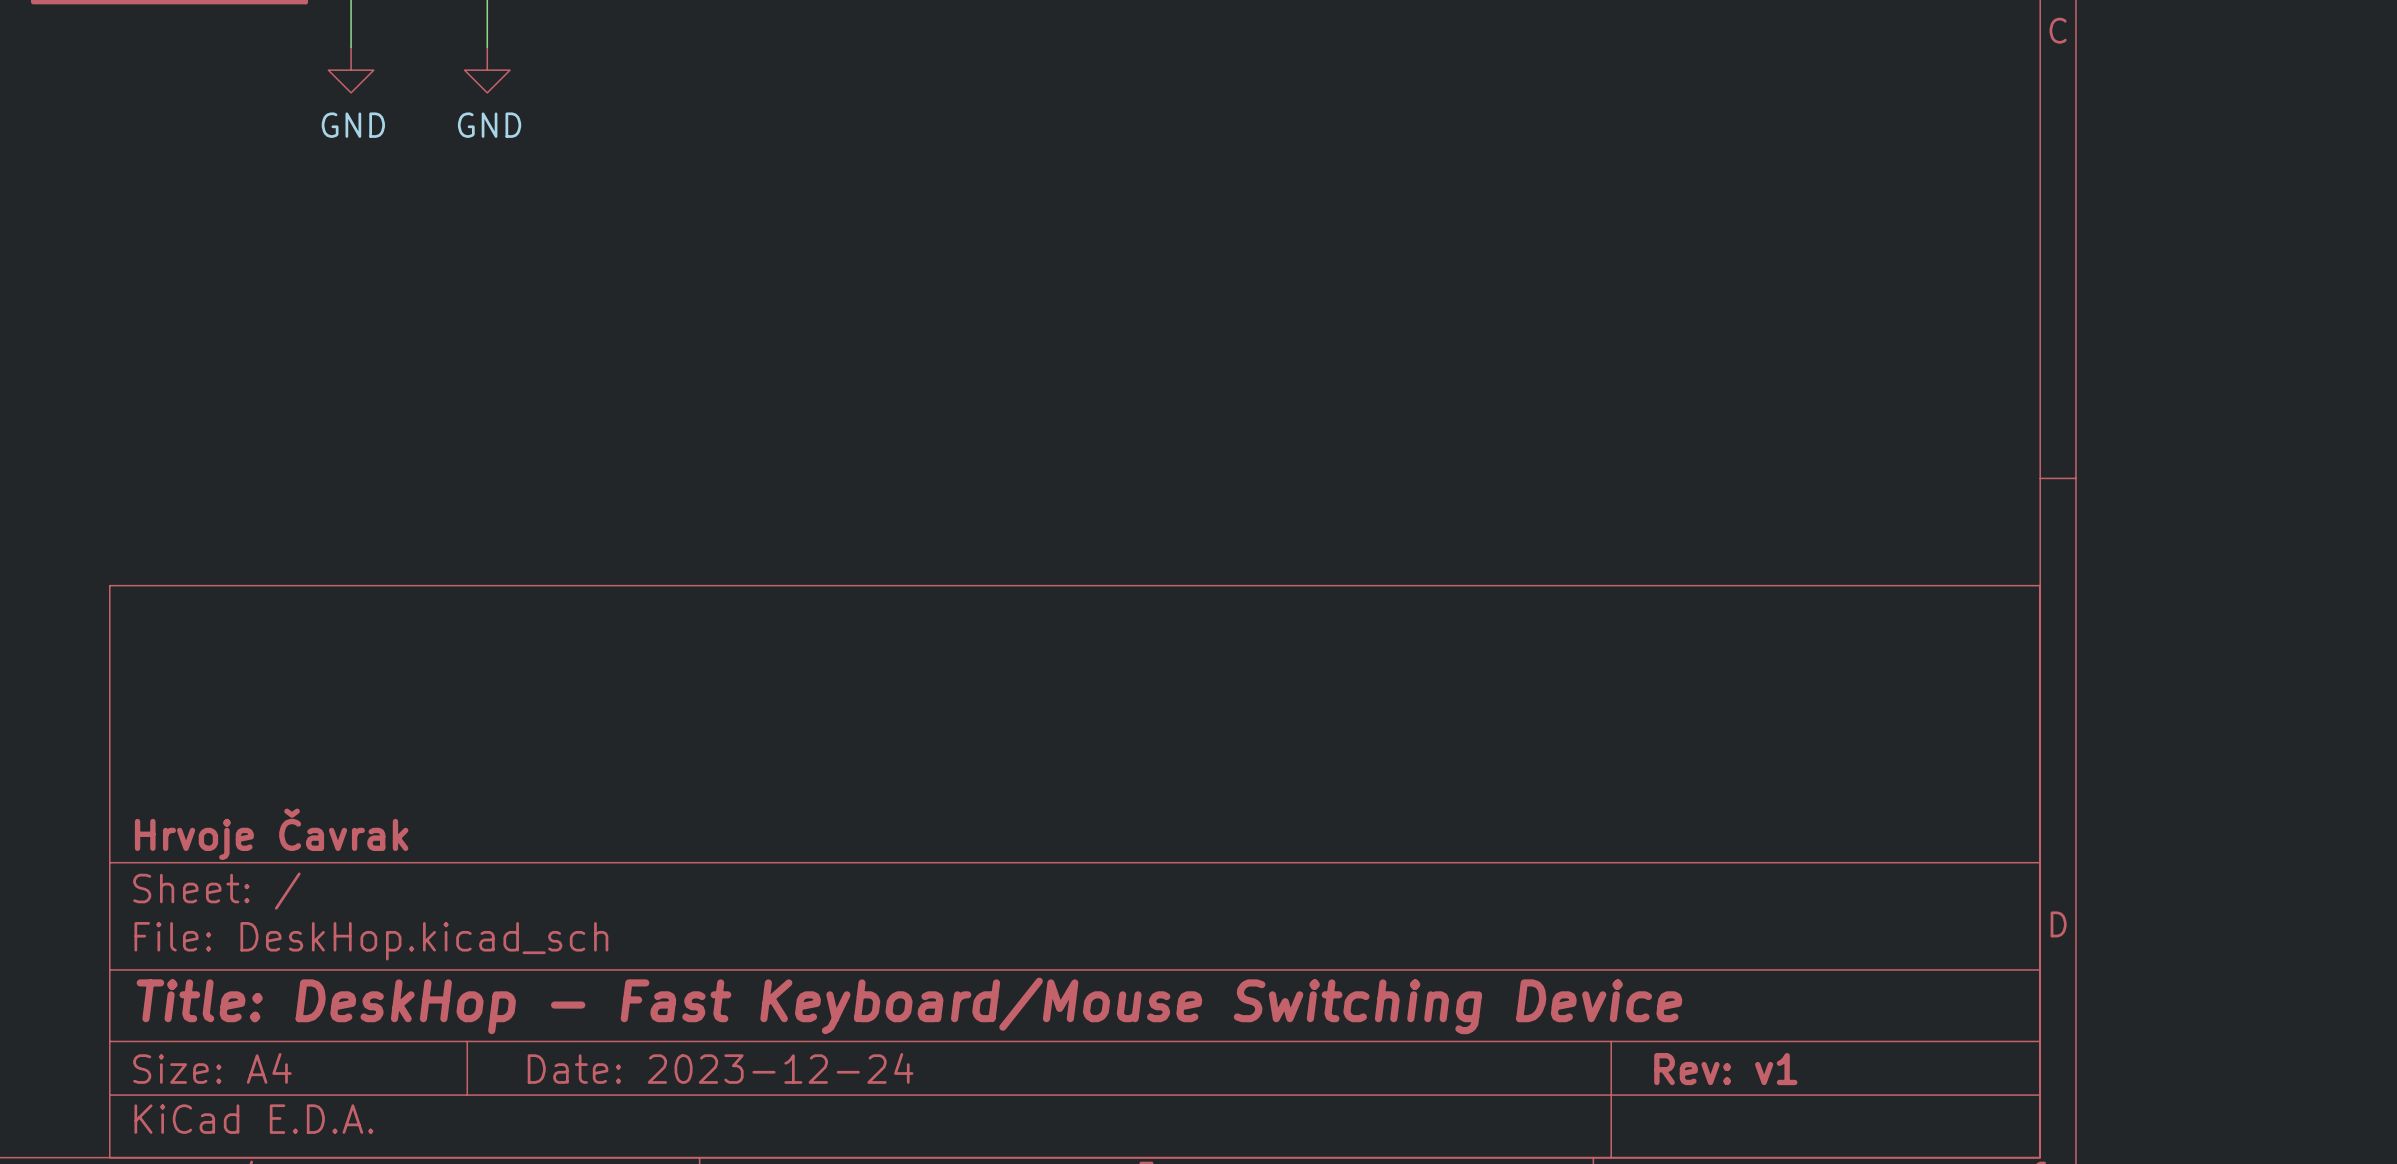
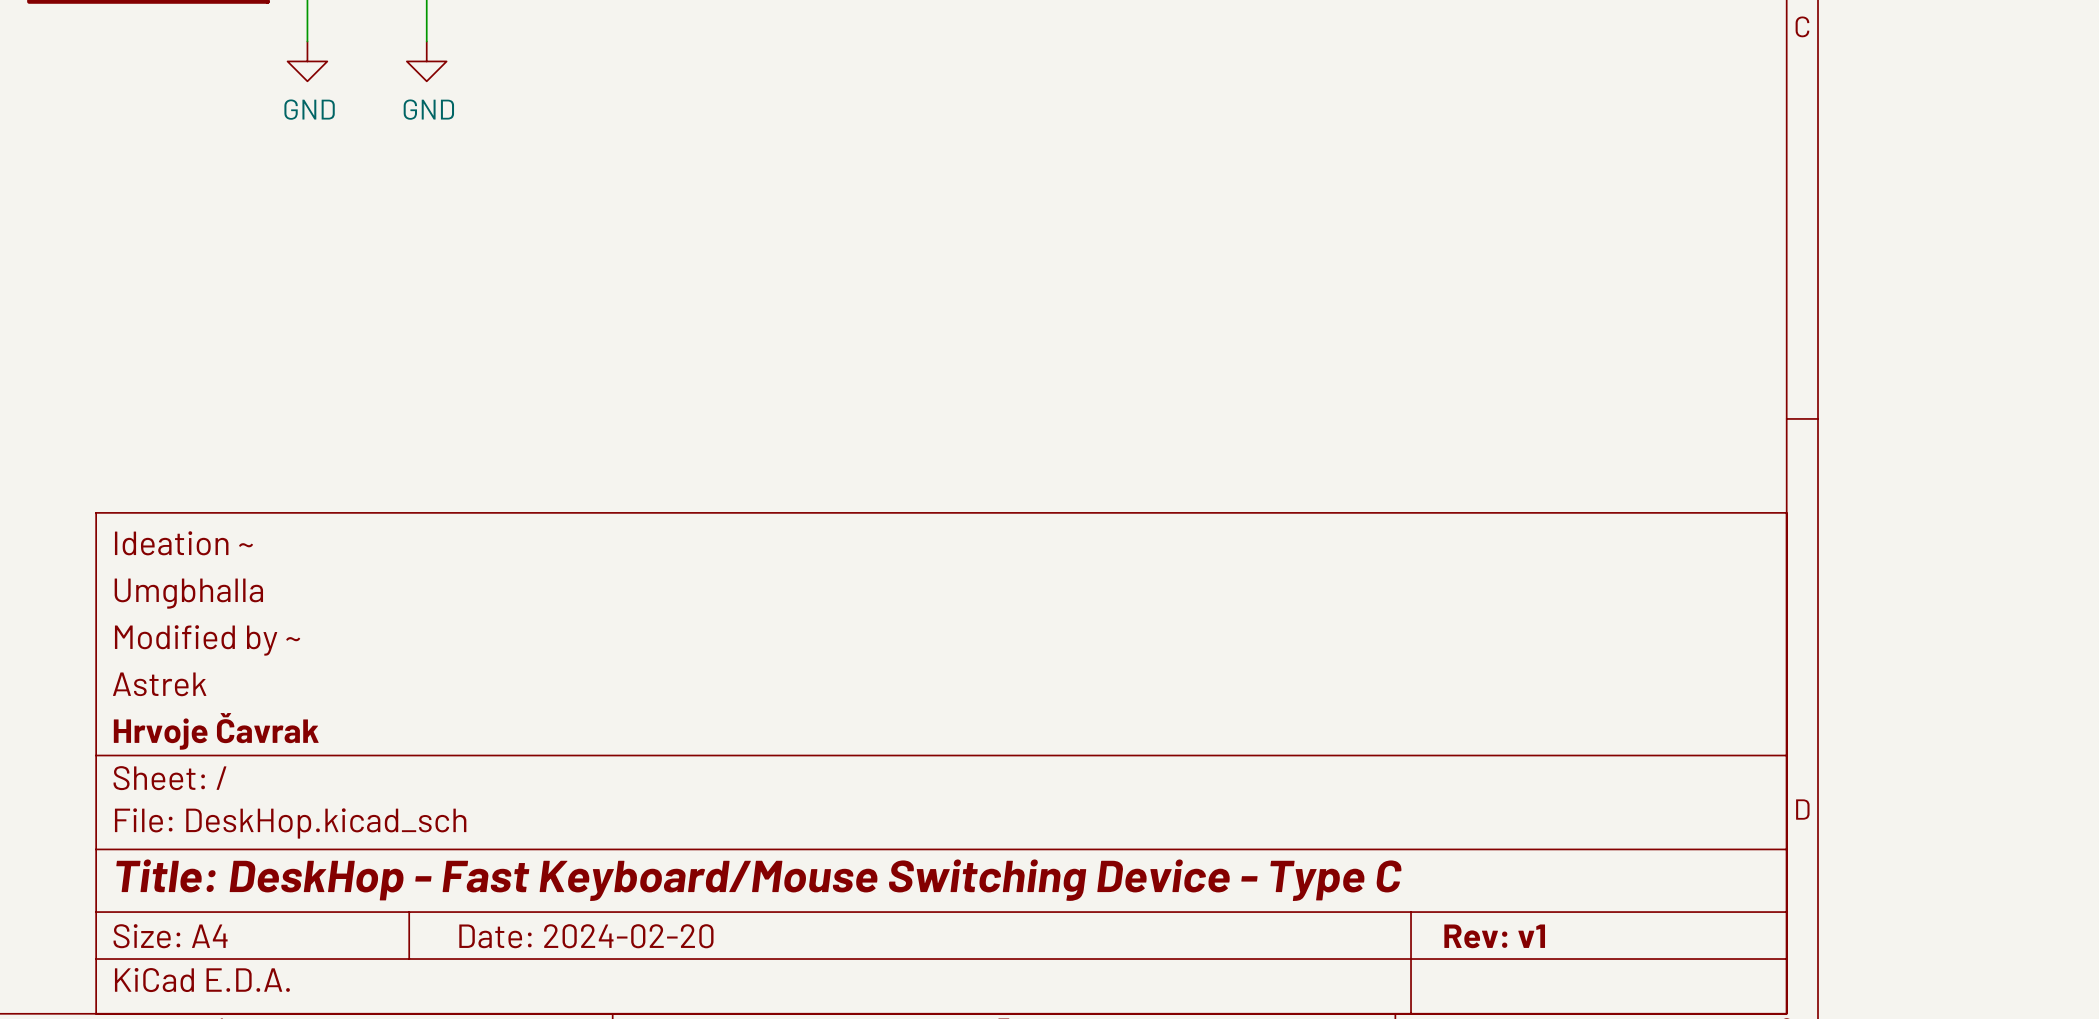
title block: none -> Ideation ~ (184, 543)
title block: none -> Umgbhalla (188, 593)
title block: none -> Modified by ~ (207, 640)
title block: none -> Astrek (159, 684)
title block: Title: DeskHop - Fast Keyboard/Mouse Switching Device (909, 1005) -> Title: DeskHop - Fast Keyboard/Mouse Switching Device - Type C (759, 880)
title block: Date: 2023-12-24 (720, 1068) -> Date: 2024-02-20 (586, 936)

